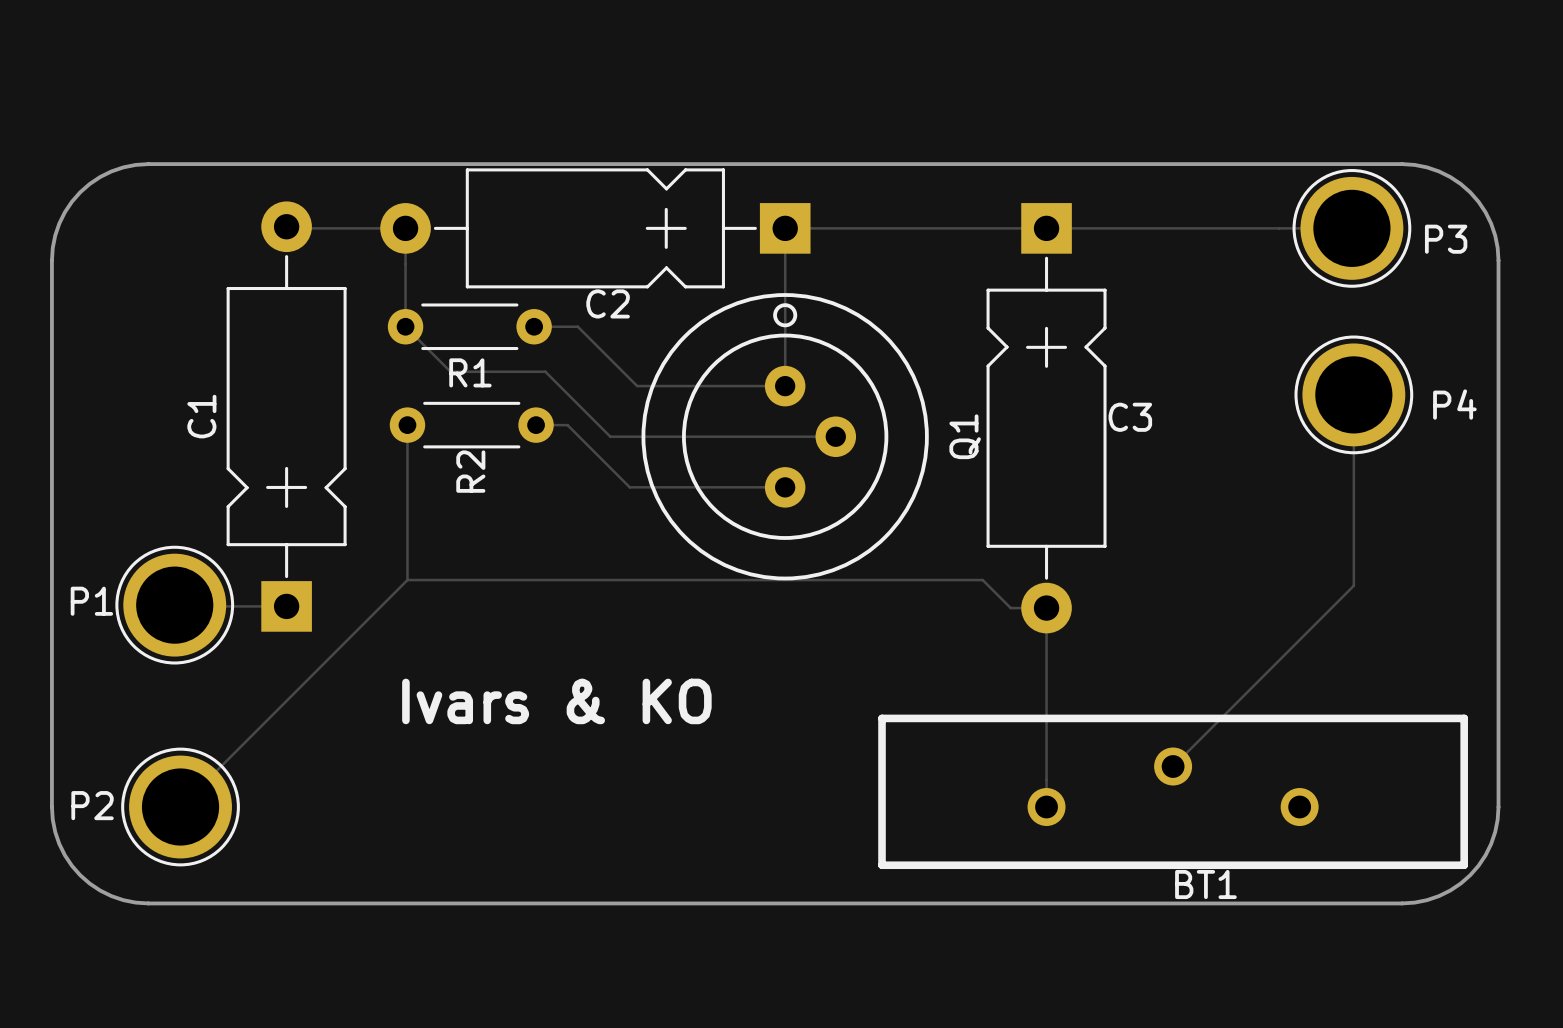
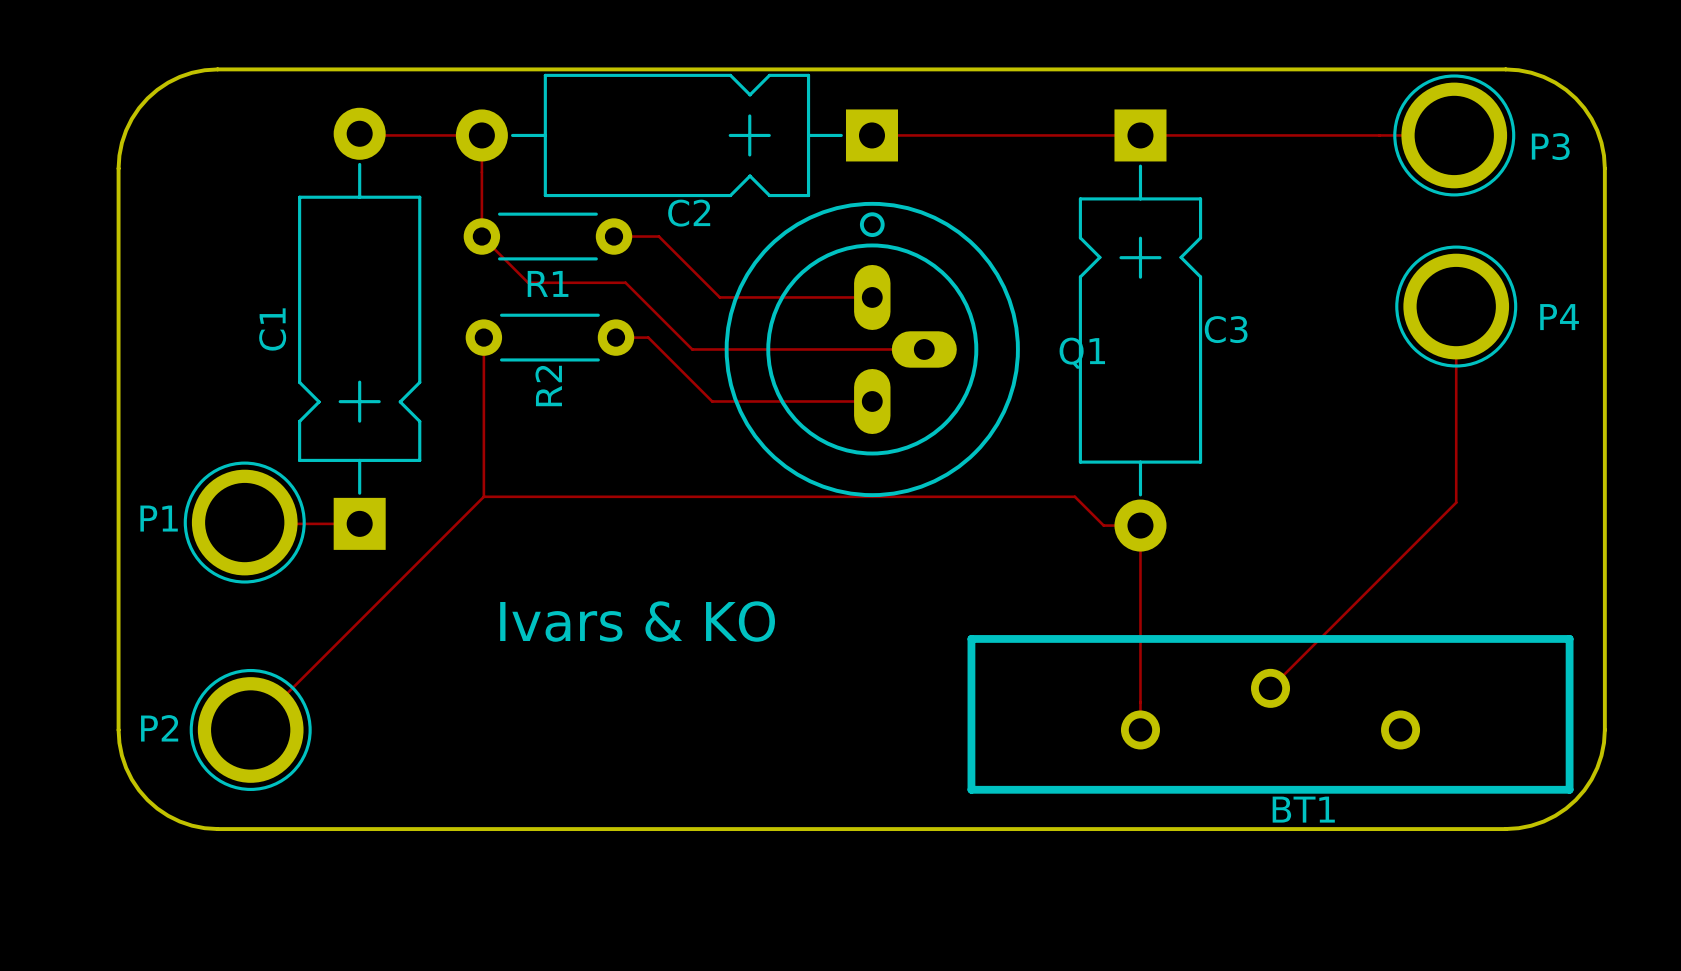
track: (785, 228) (785, 386) -> none
Q1 footprint: [641, 293, 929, 581] -> [724, 201, 1020, 498]

